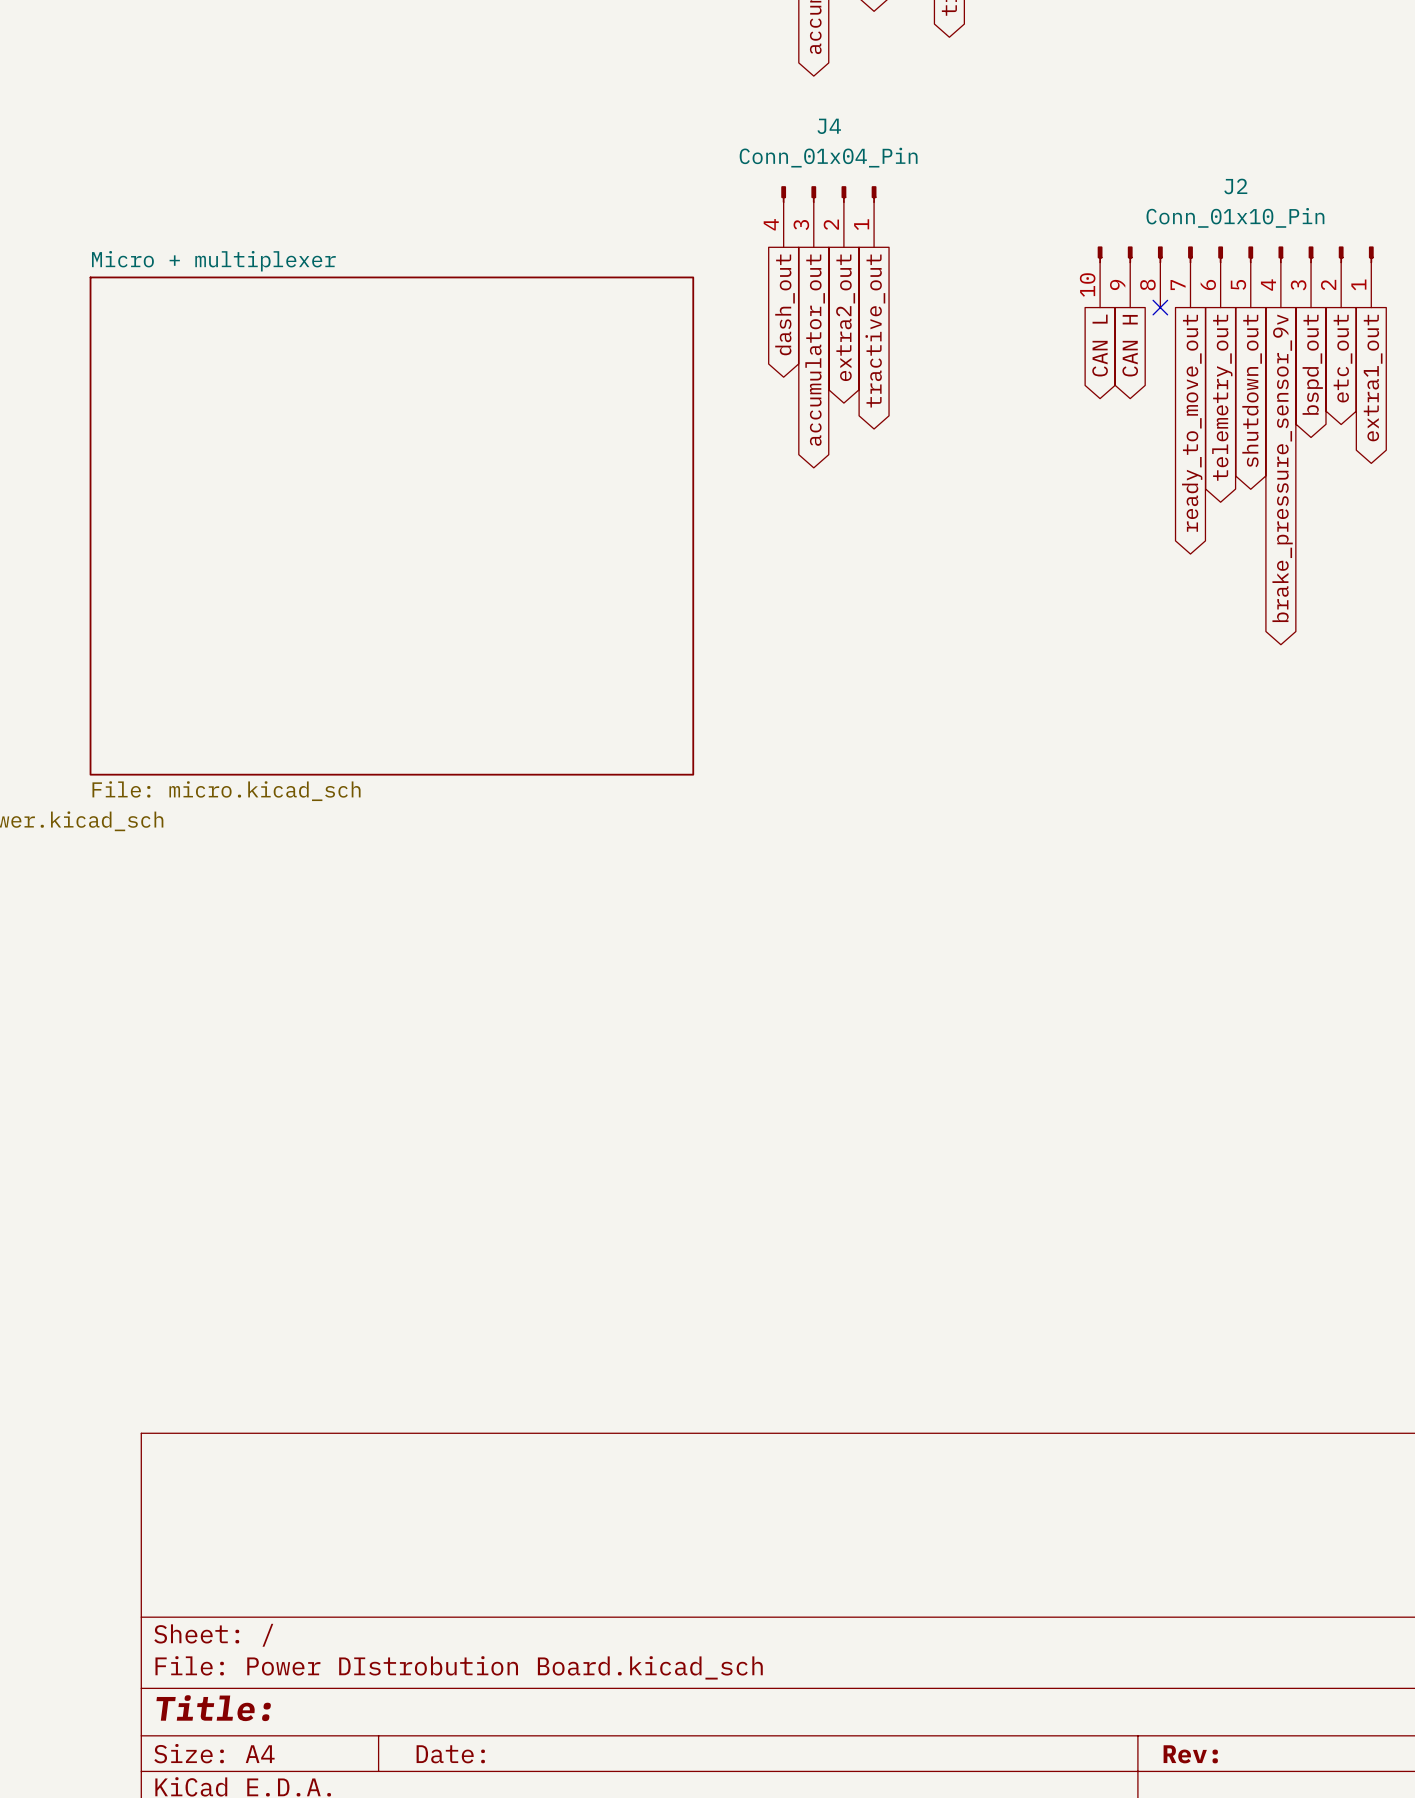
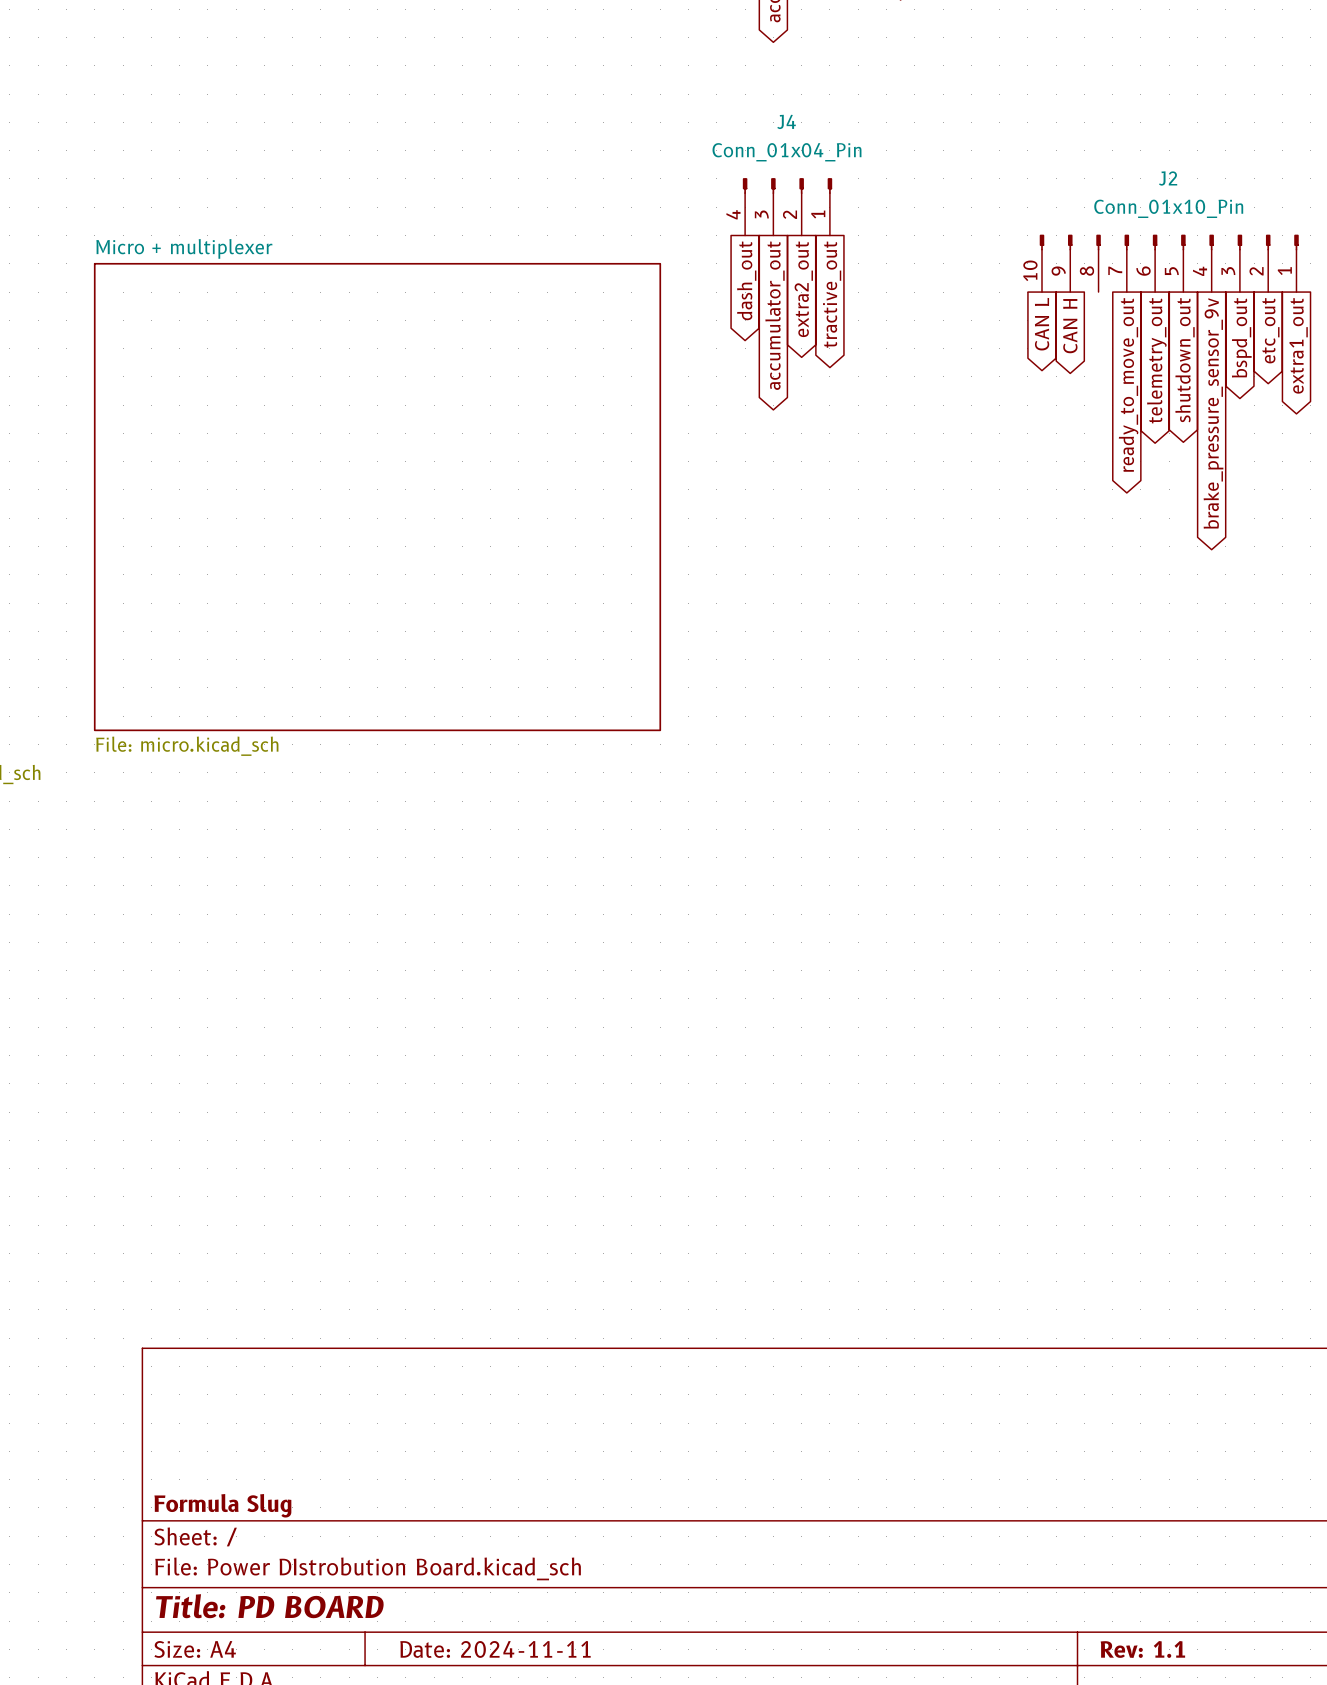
no-connect mark: (1160, 307) -> none
title block: none -> Formula Slug (222, 1505)
title block: Title: (213, 1708) -> Title: PD BOARD (269, 1606)
title block: Date: (450, 1754) -> Date: 2024-11-11 (495, 1649)
title block: Rev: (1190, 1754) -> Rev: 1.1 (1142, 1649)

